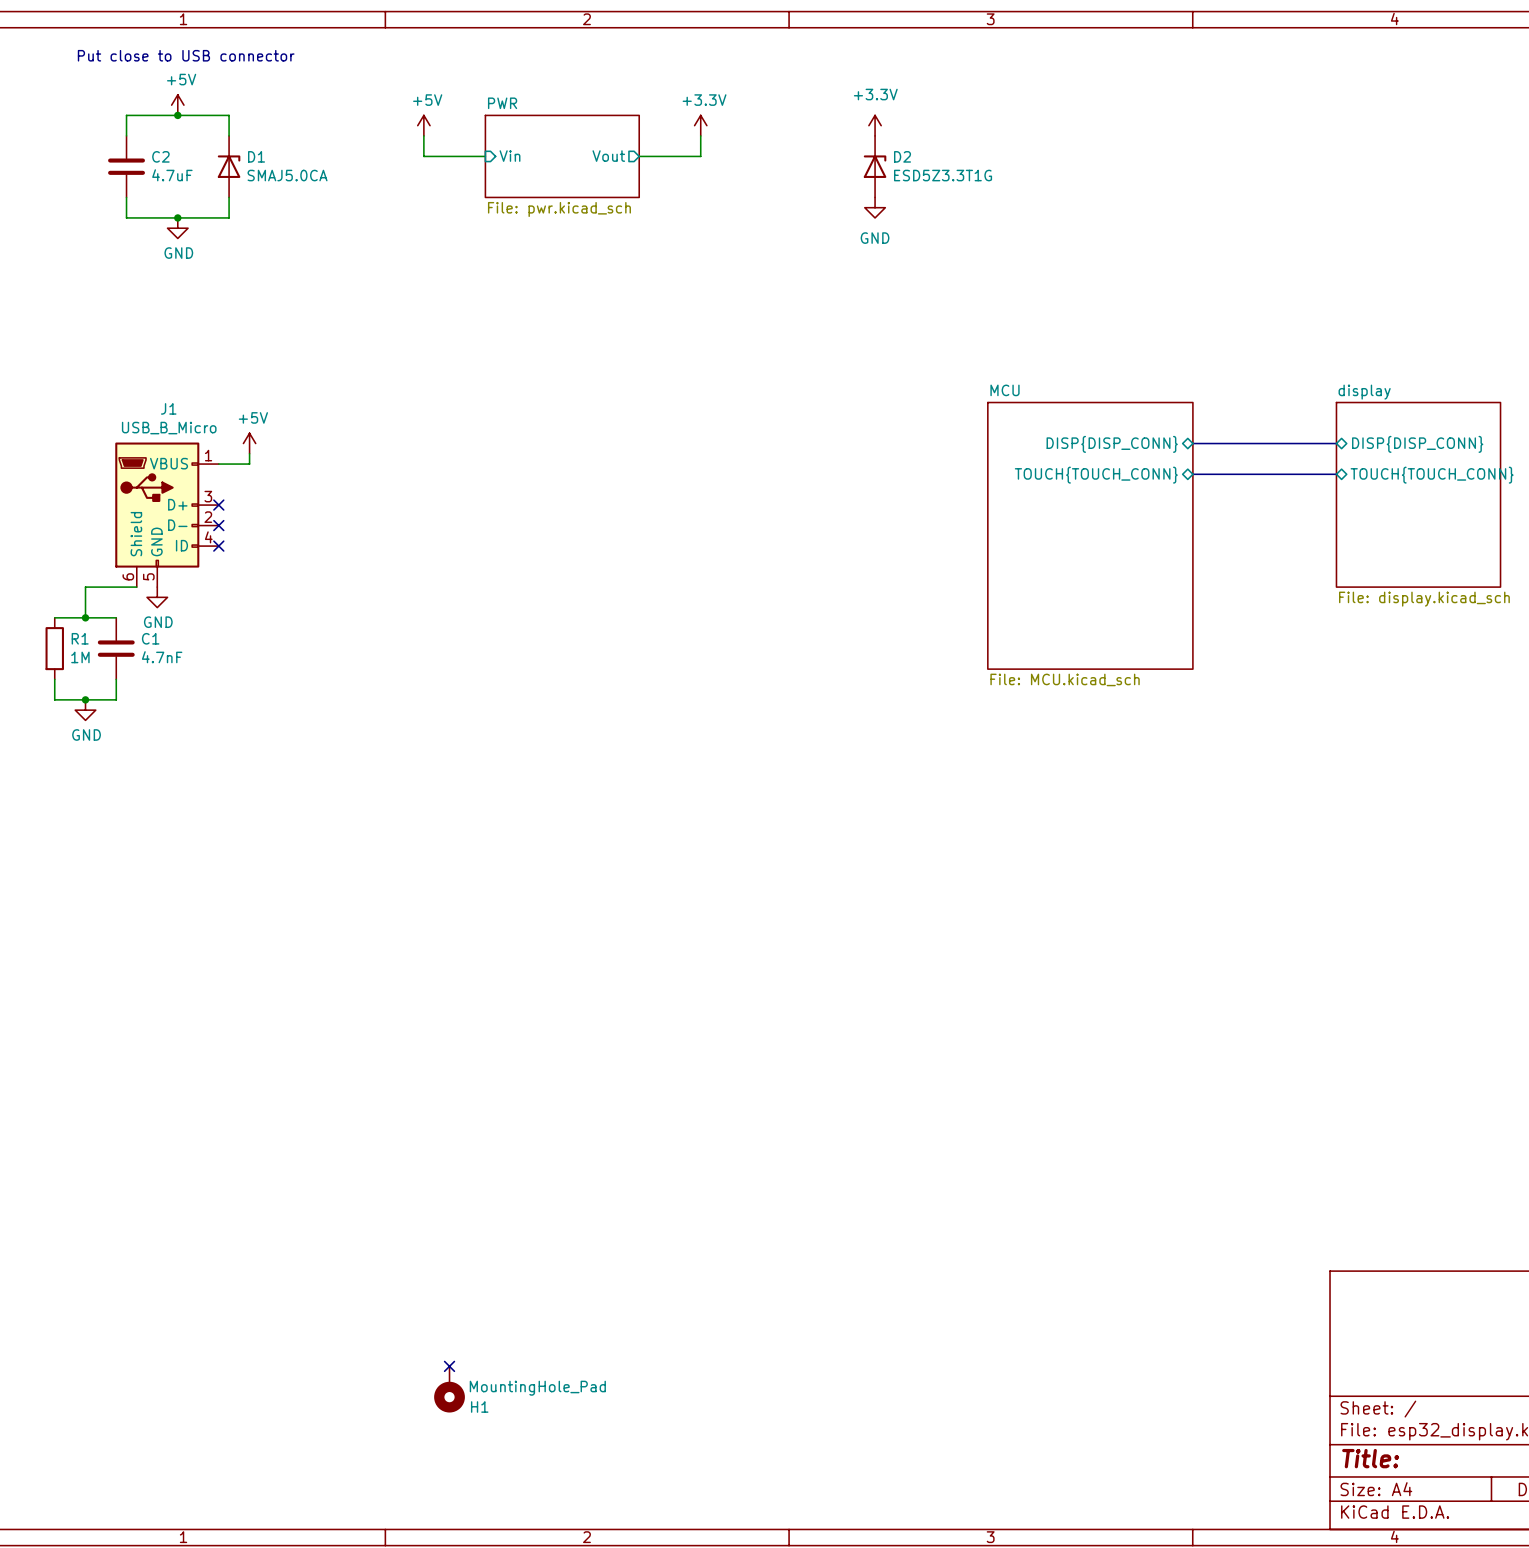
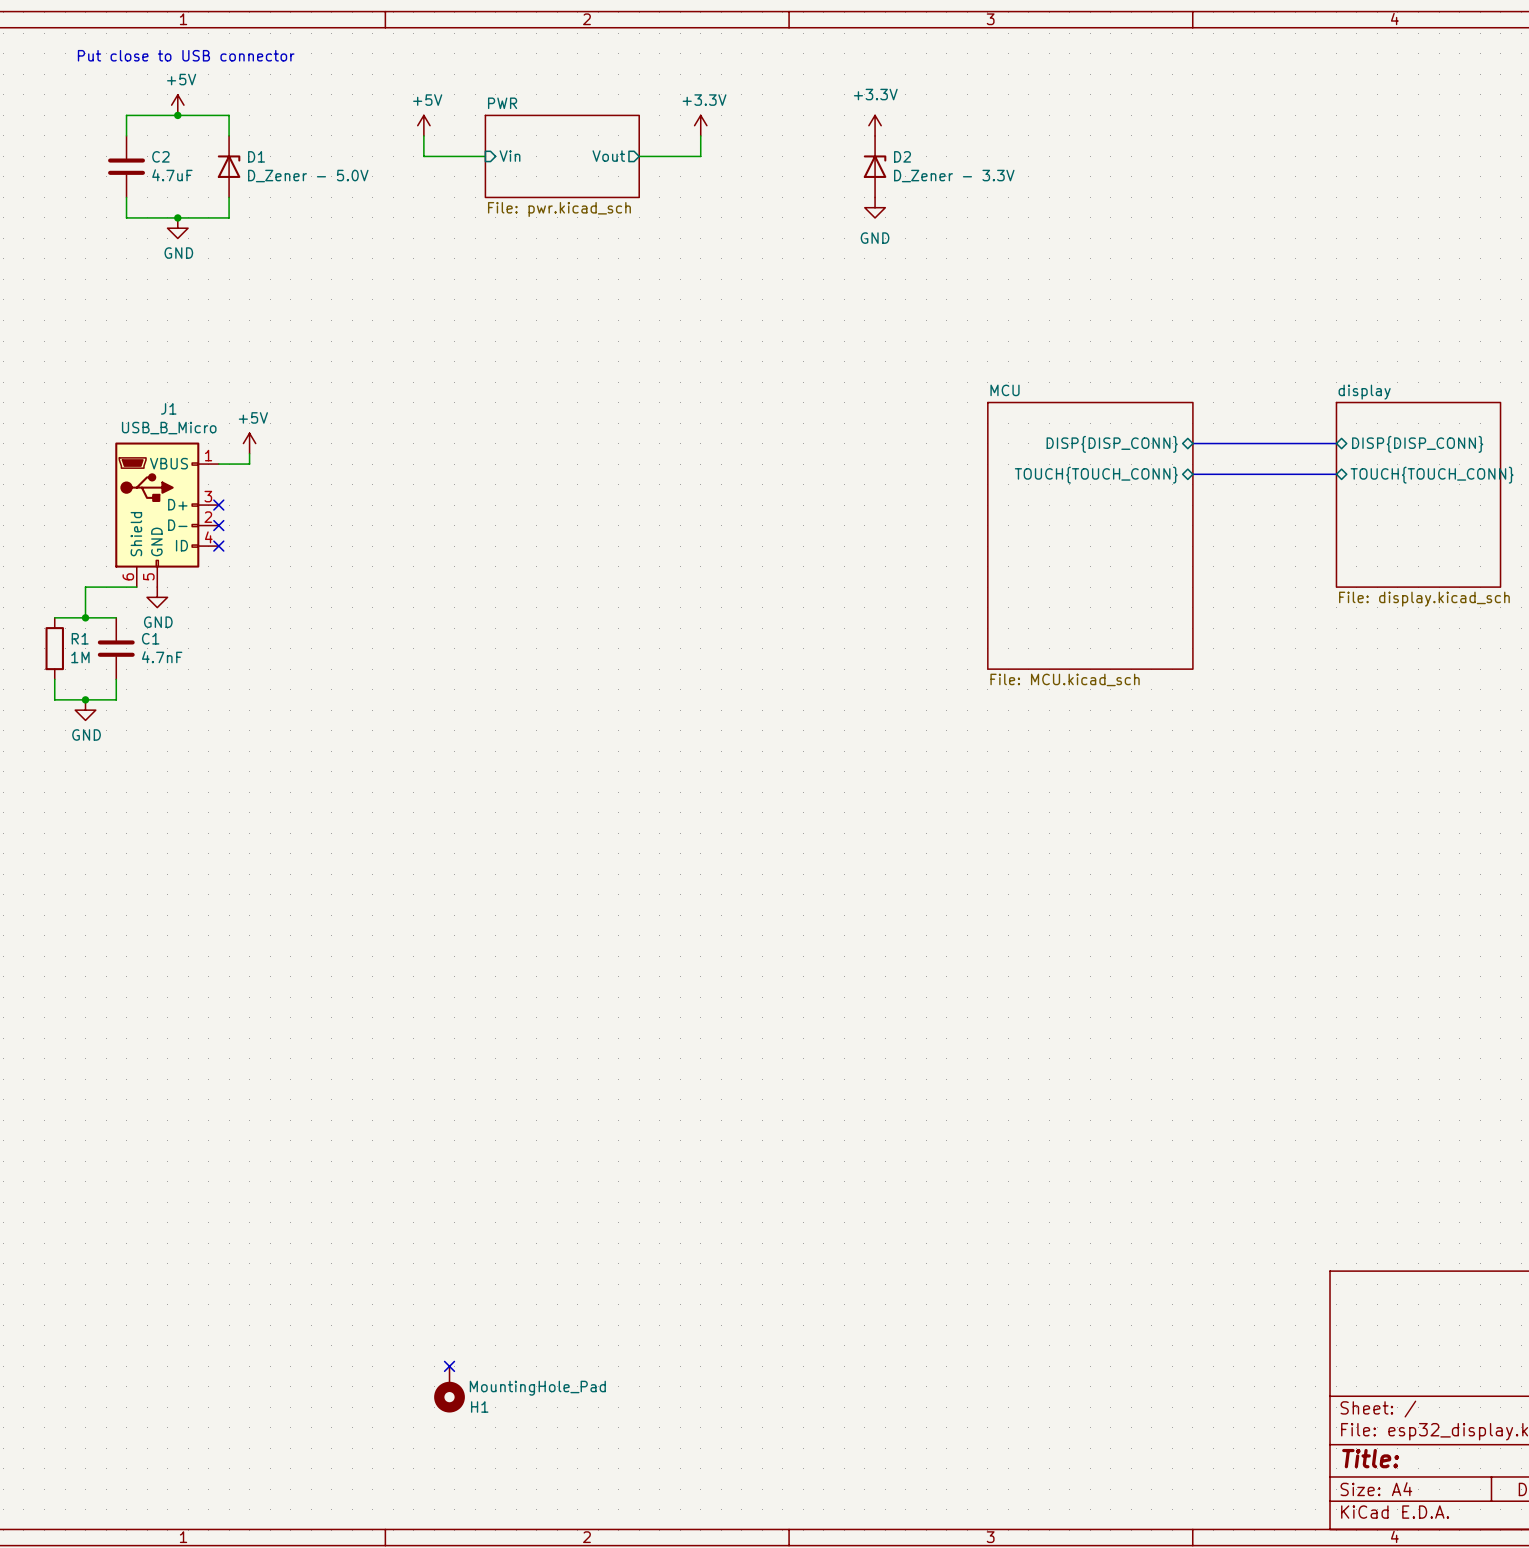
D1 value: SMAJ5.0CA (287, 175) -> D_Zener - 5.0V (308, 176)
D2 value: ESD5Z3.3T1G (943, 175) -> D_Zener - 3.3V (954, 176)

